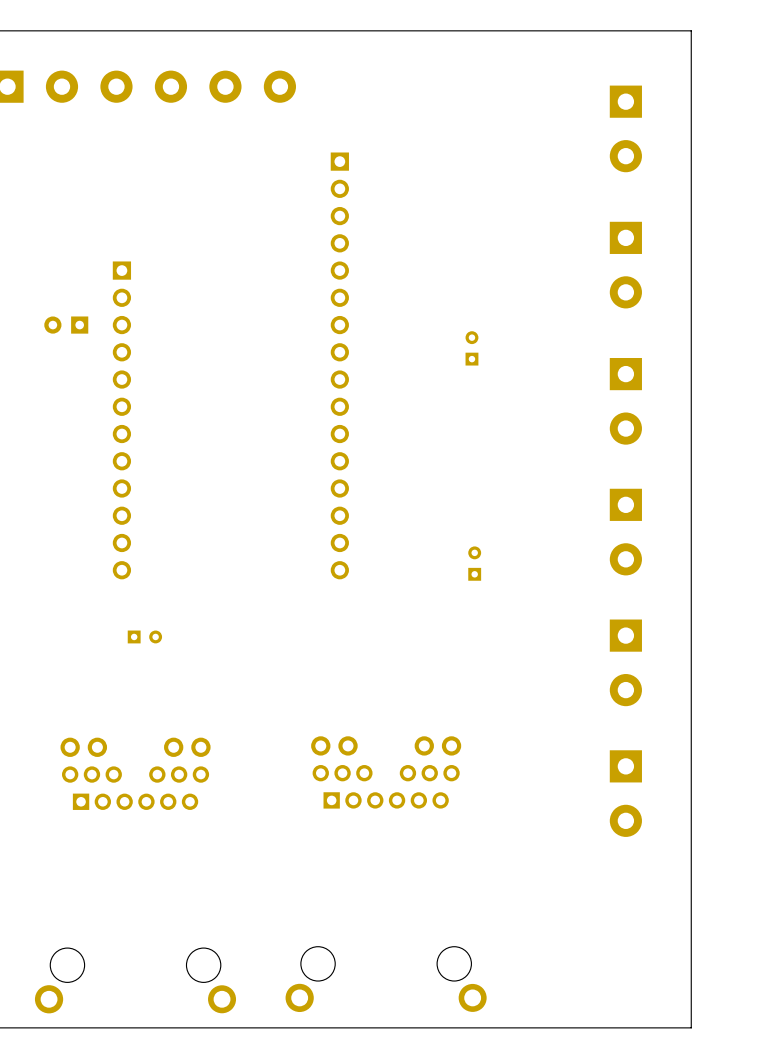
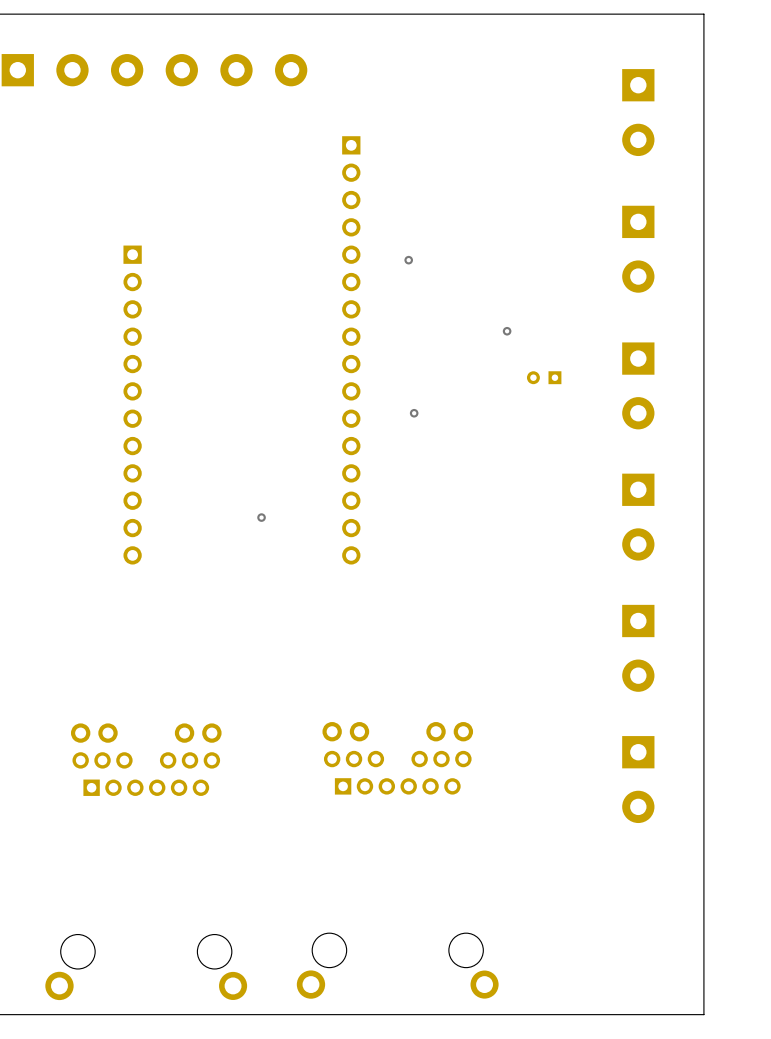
via: none -> (408, 260)
part: (66, 325) -> none
via: none -> (507, 331)
part rotation: 0° (471, 348) -> 90° counterclockwise (544, 377)
part position: (471, 348) -> (544, 377)
via: none -> (414, 413)
via: none -> (261, 517)
part: (474, 563) -> none
part: (144, 636) -> none

